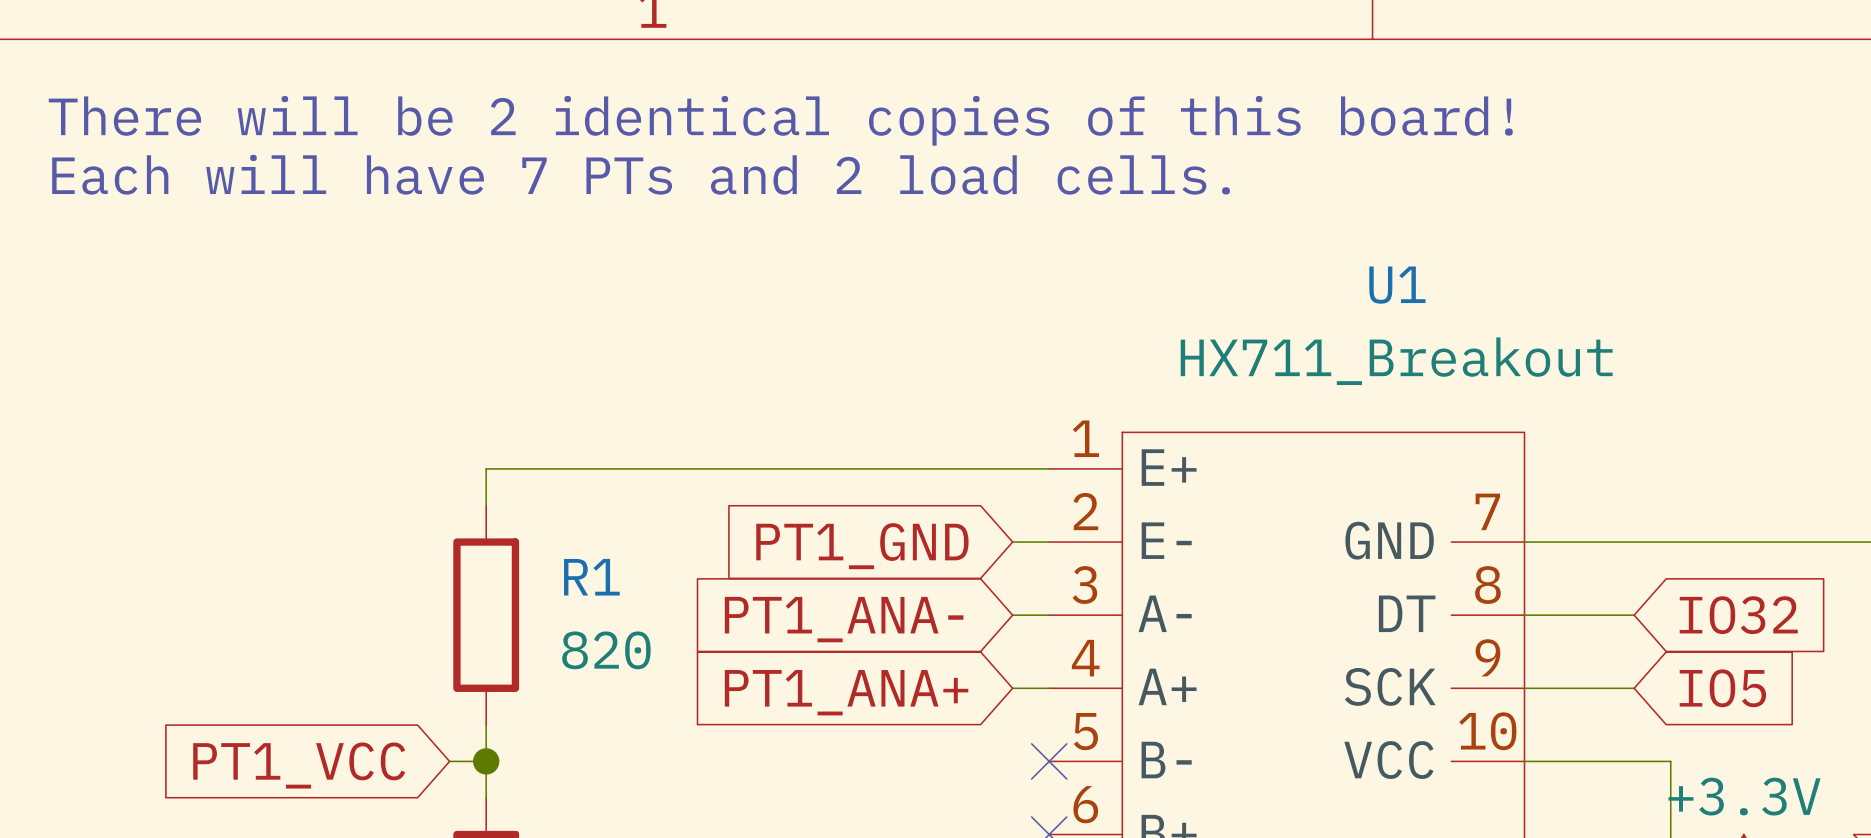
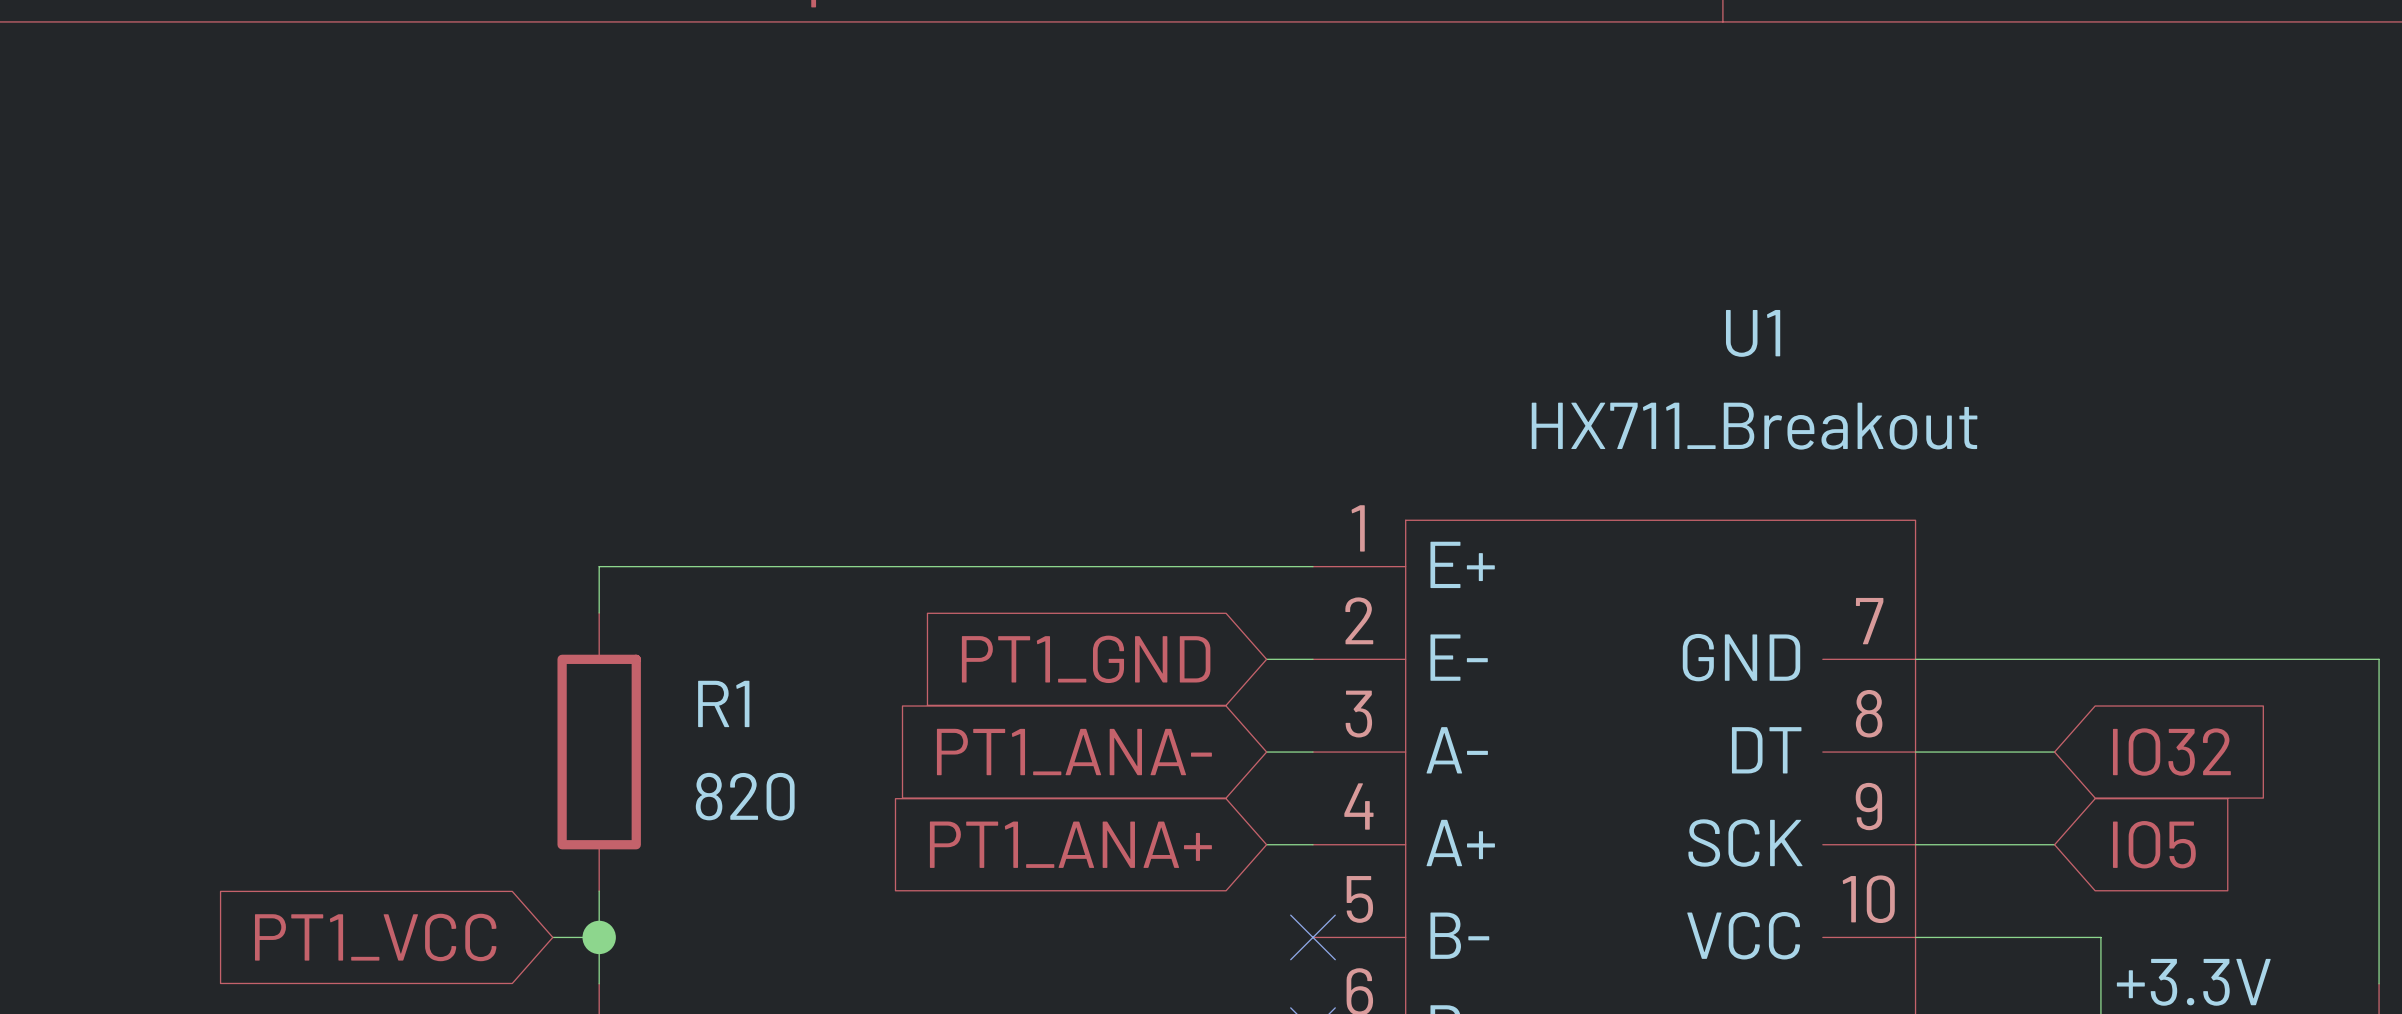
text: There will be 2 identical copies of this board! (780, 120) -> none
text: Each will have 7 PTs and 2 load cells. (641, 174) -> none

